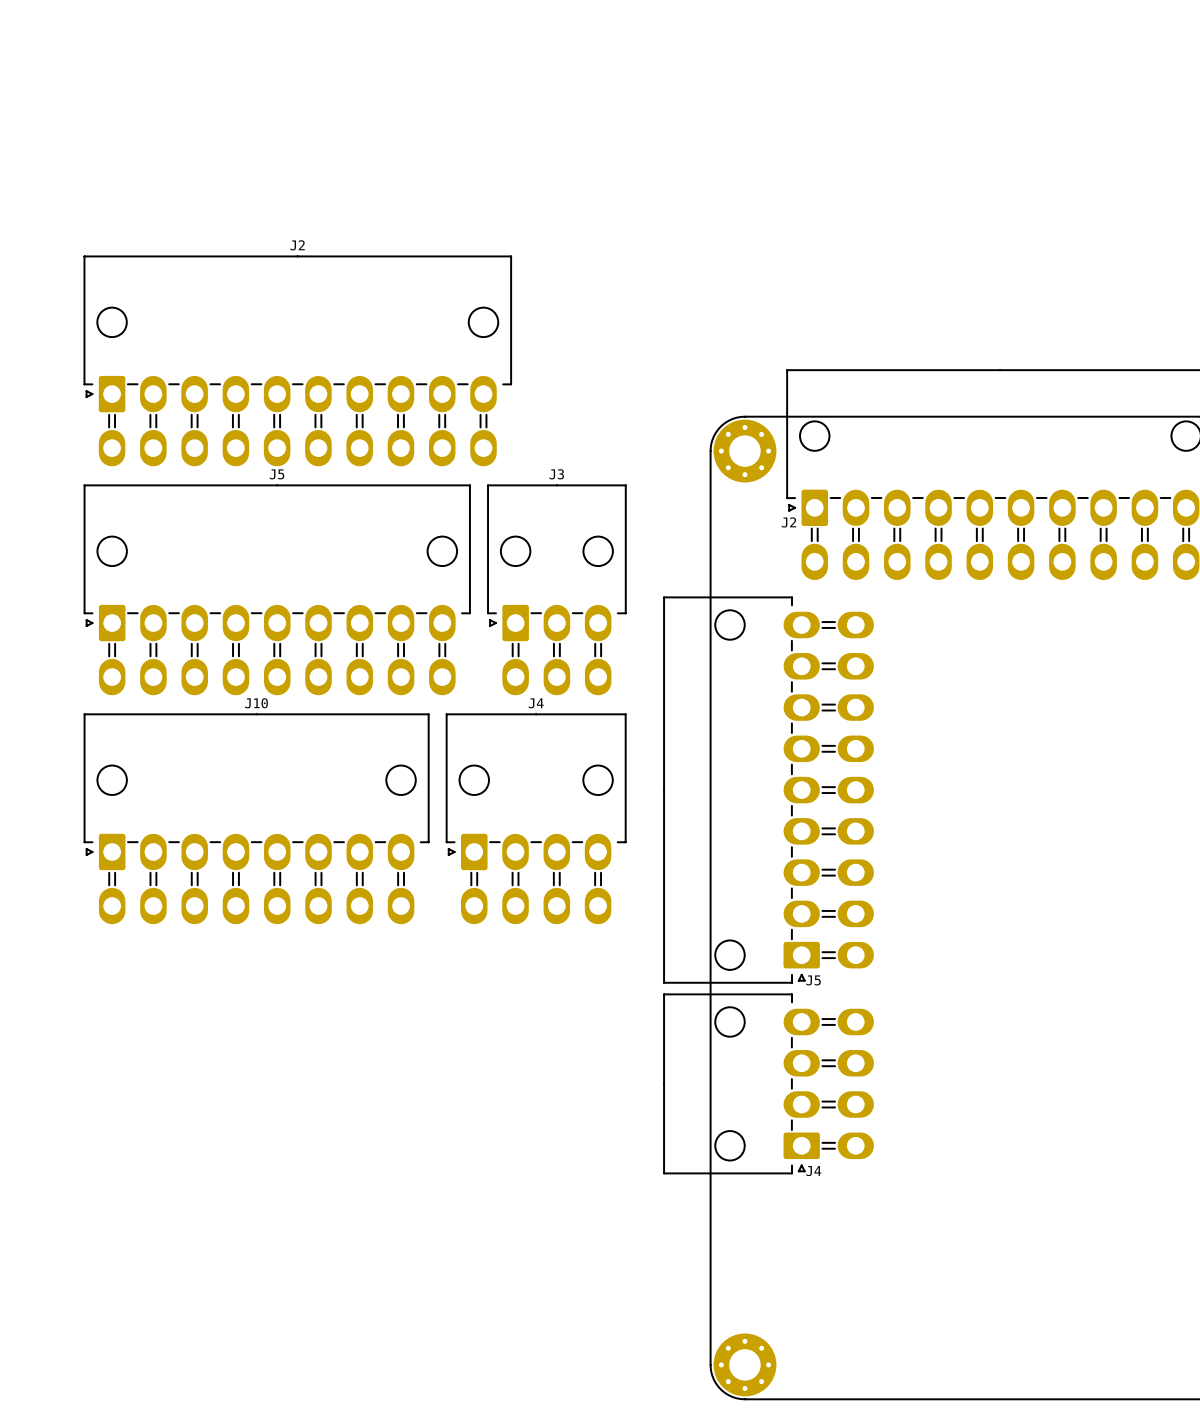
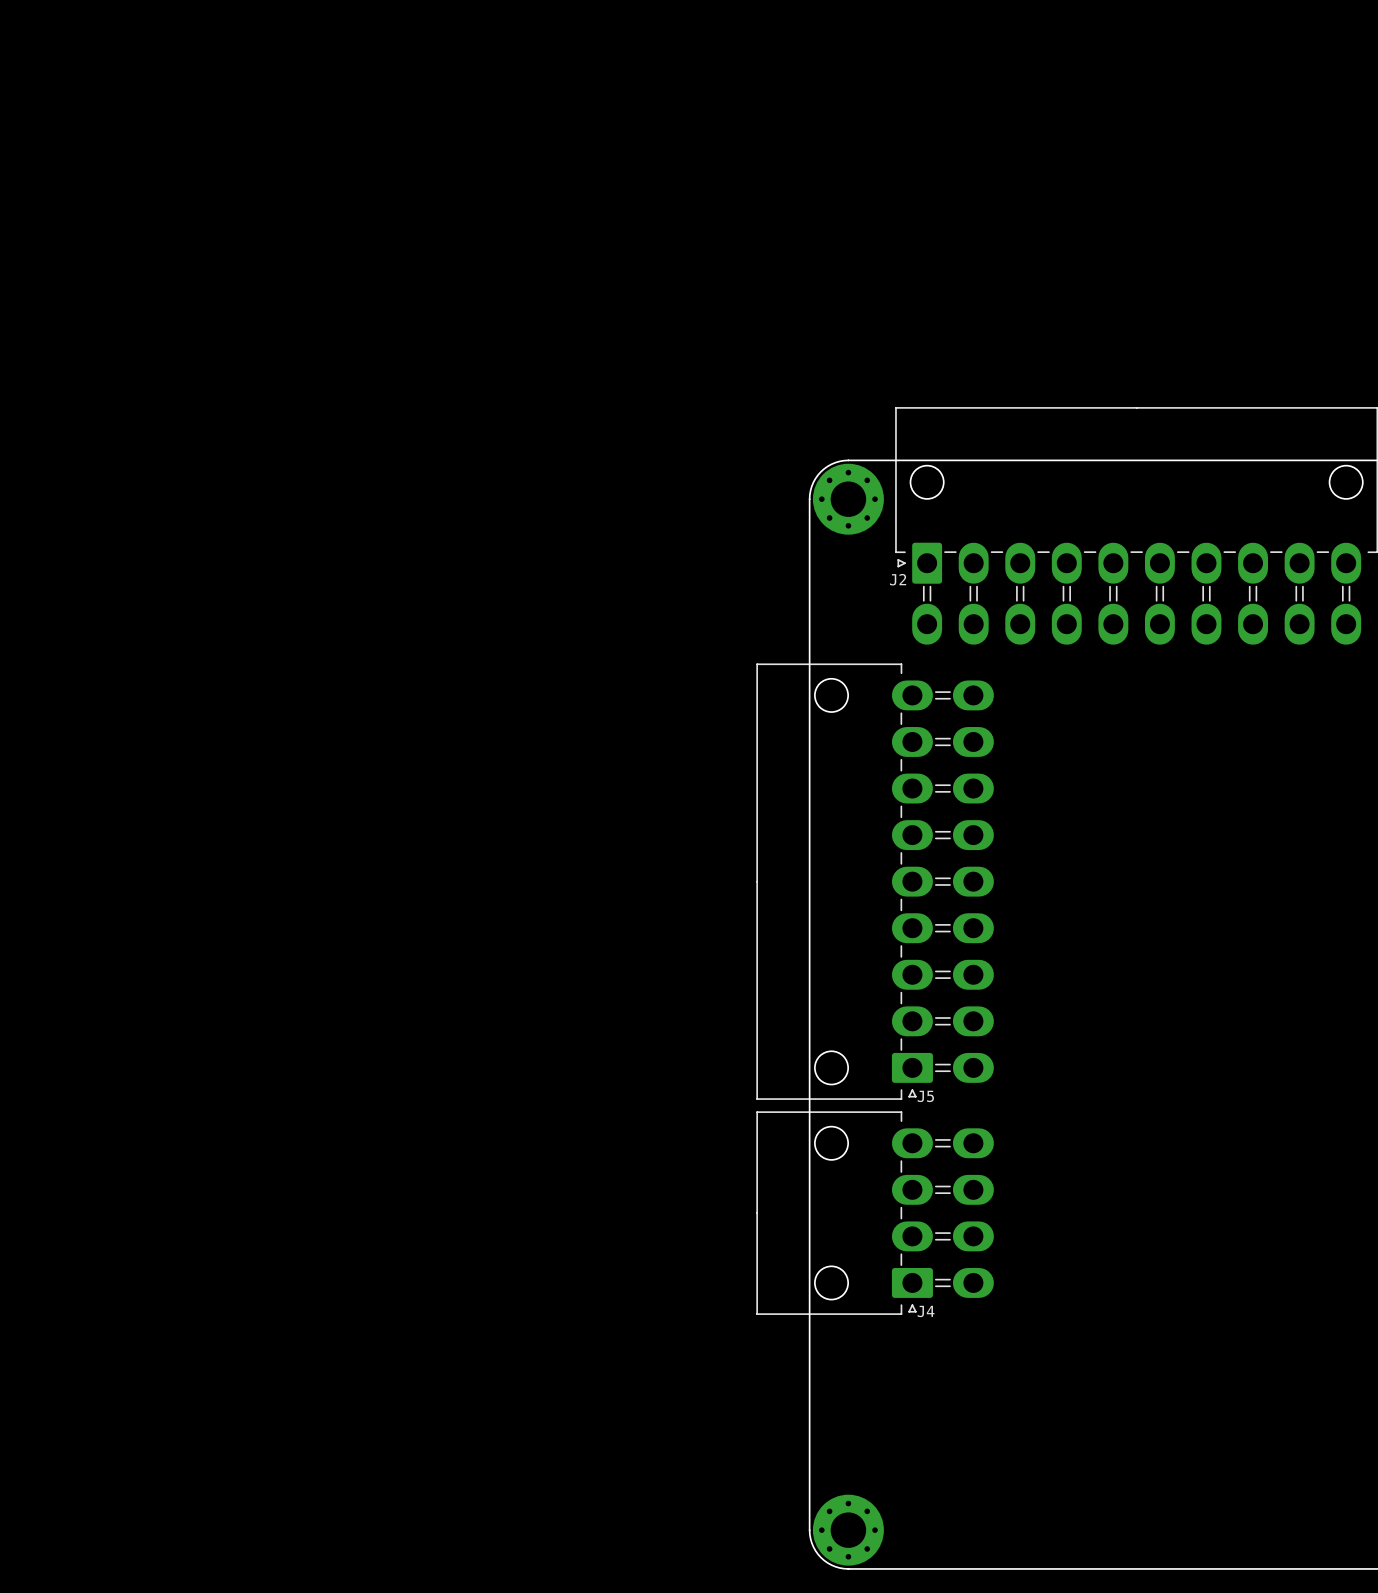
J2: (297, 361) -> none
J5: (277, 590) -> none
J3: (556, 590) -> none
J10: (256, 818) -> none
J4: (536, 818) -> none

